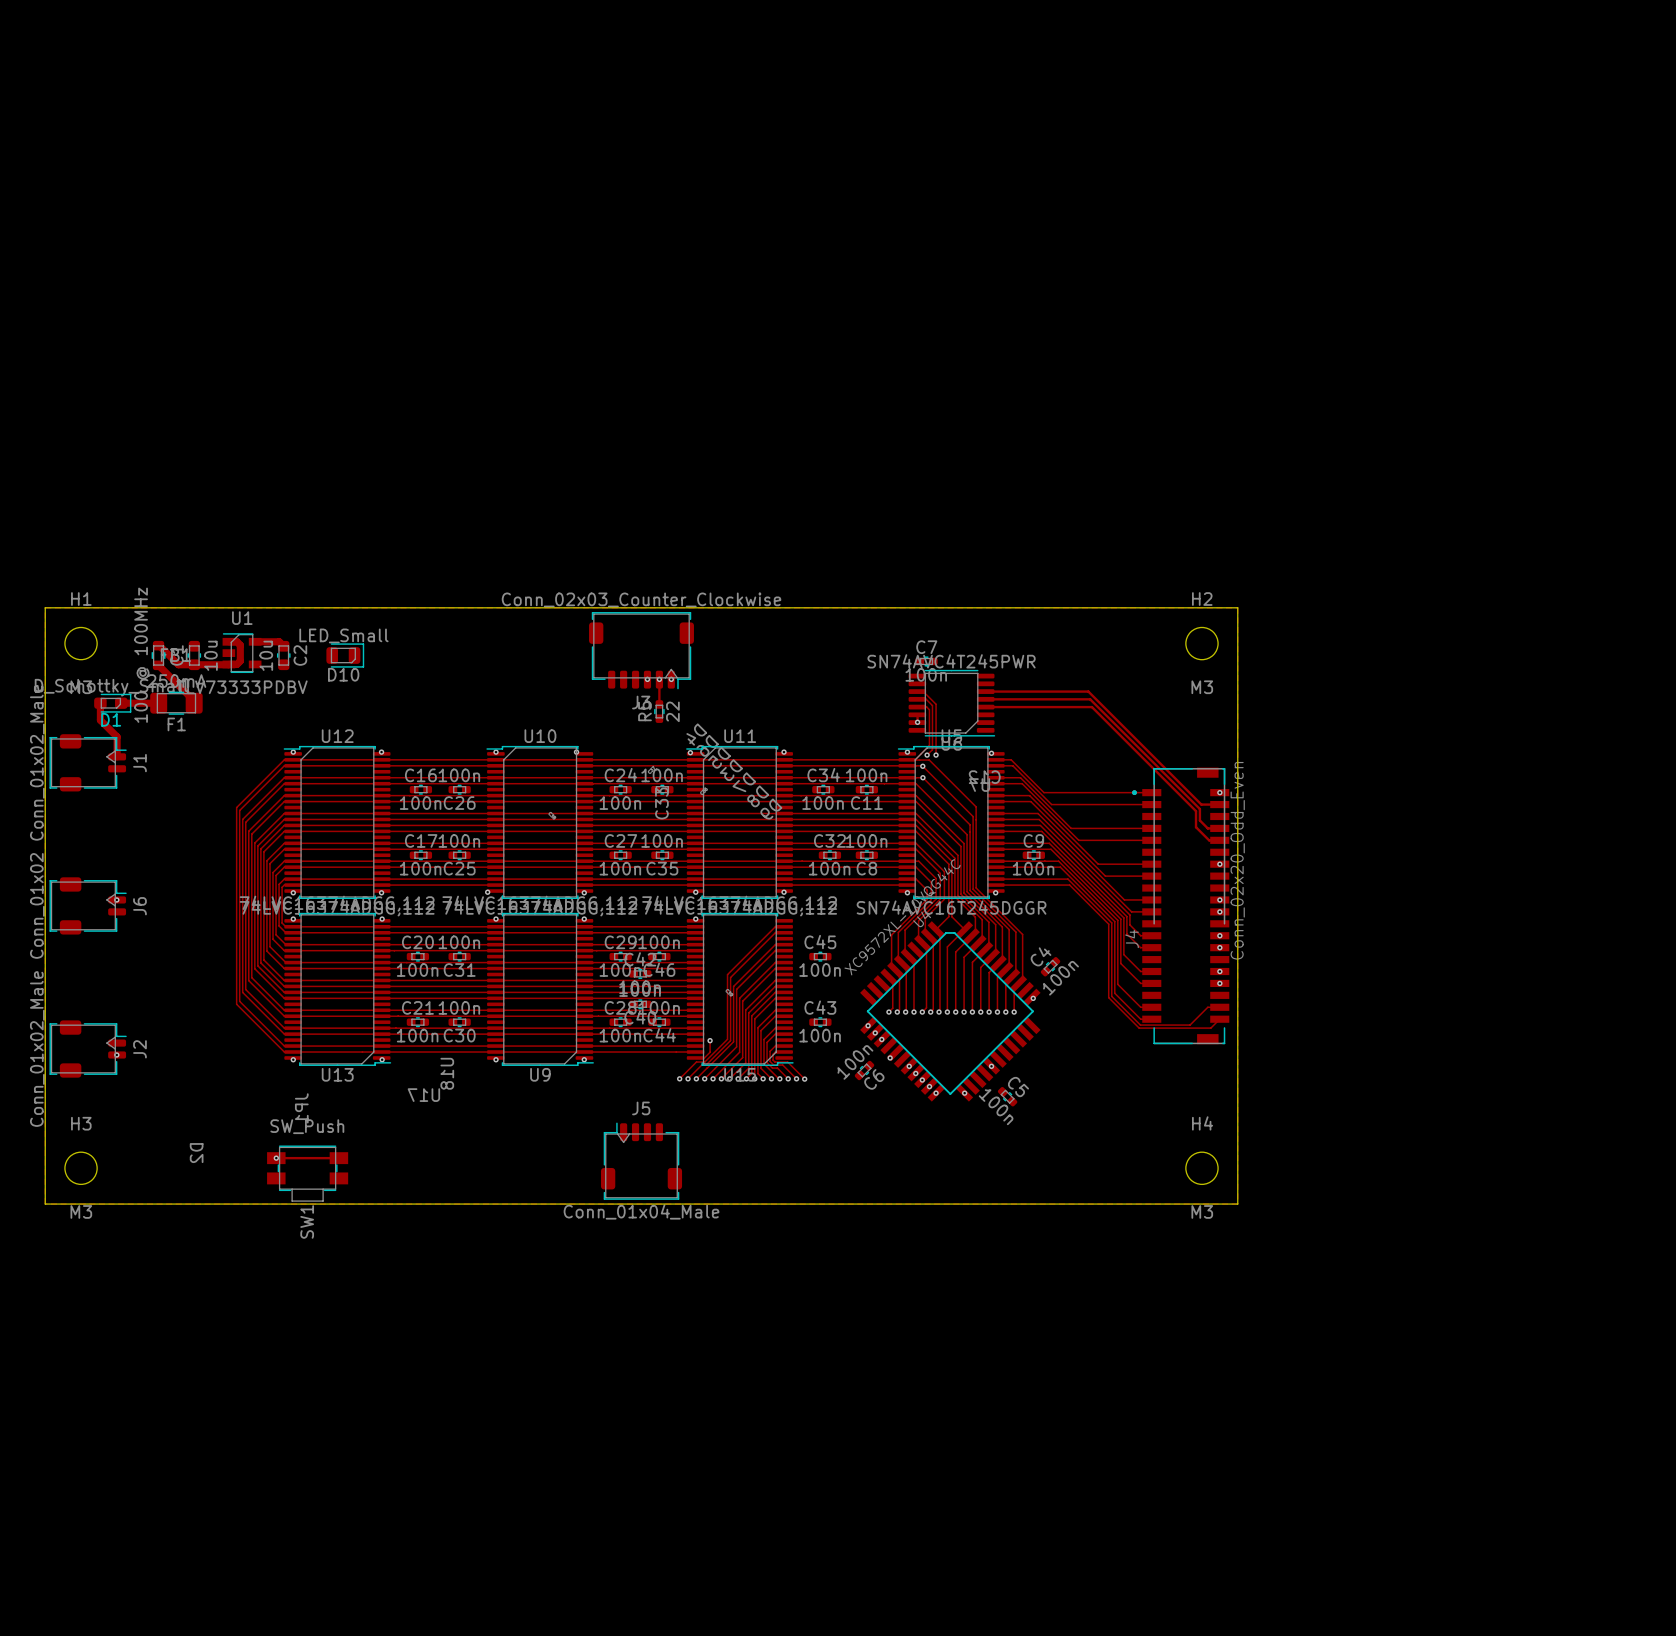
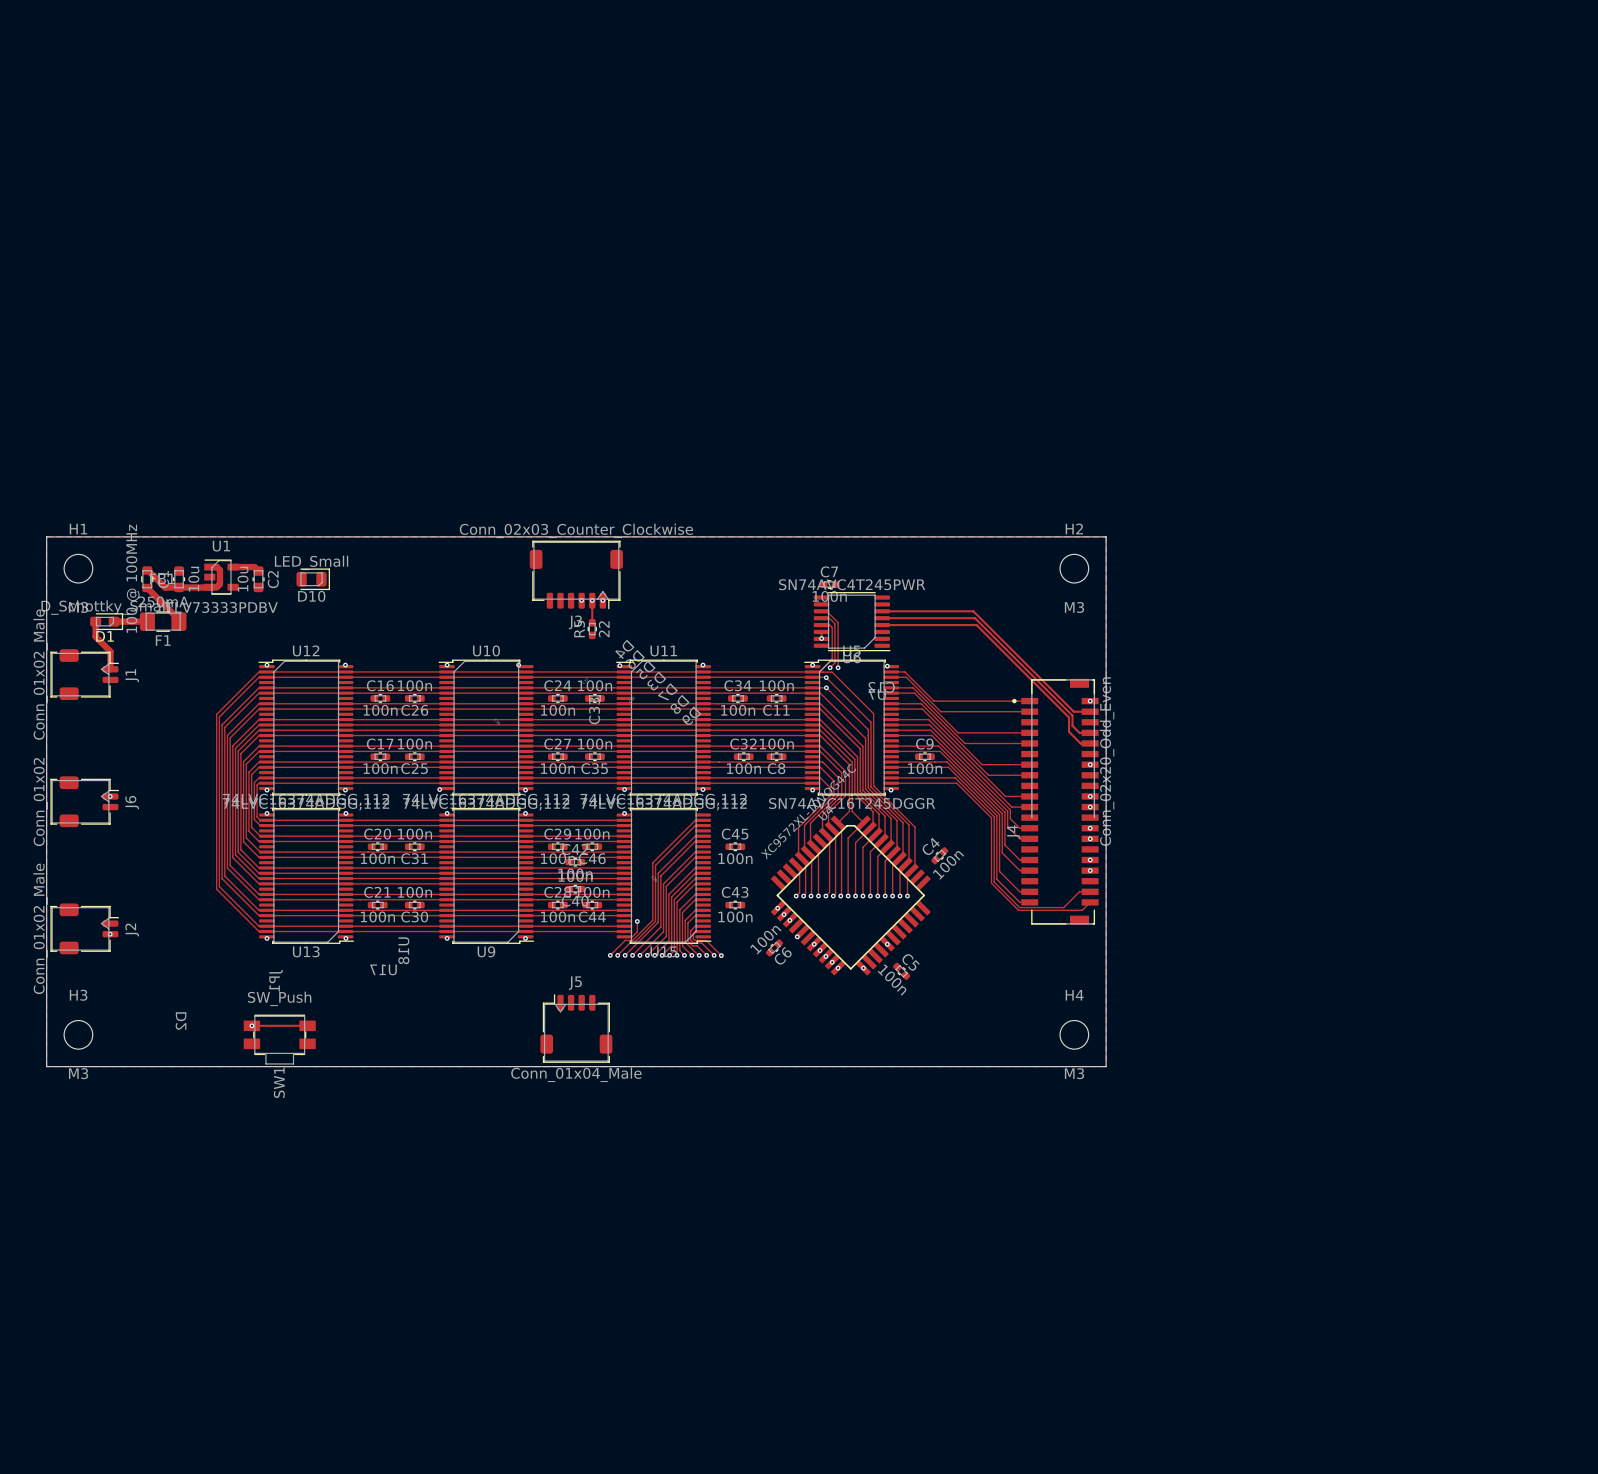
via: (1033, 998) -> none

